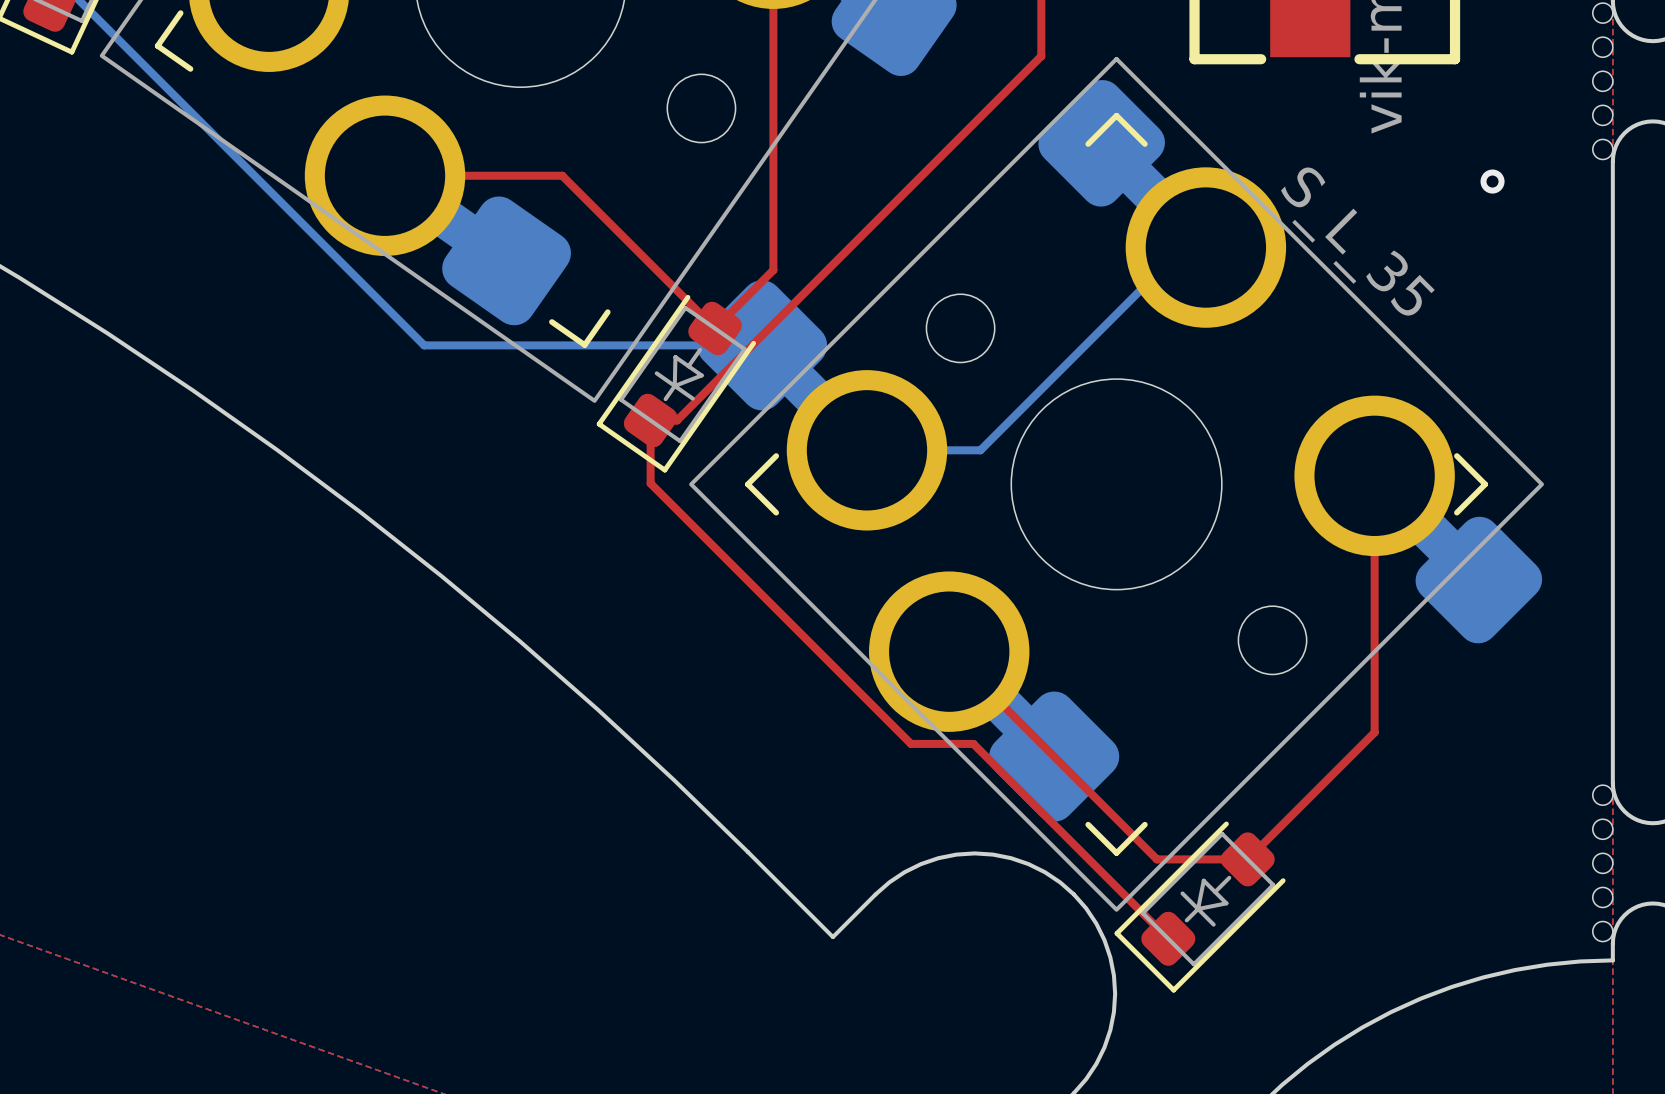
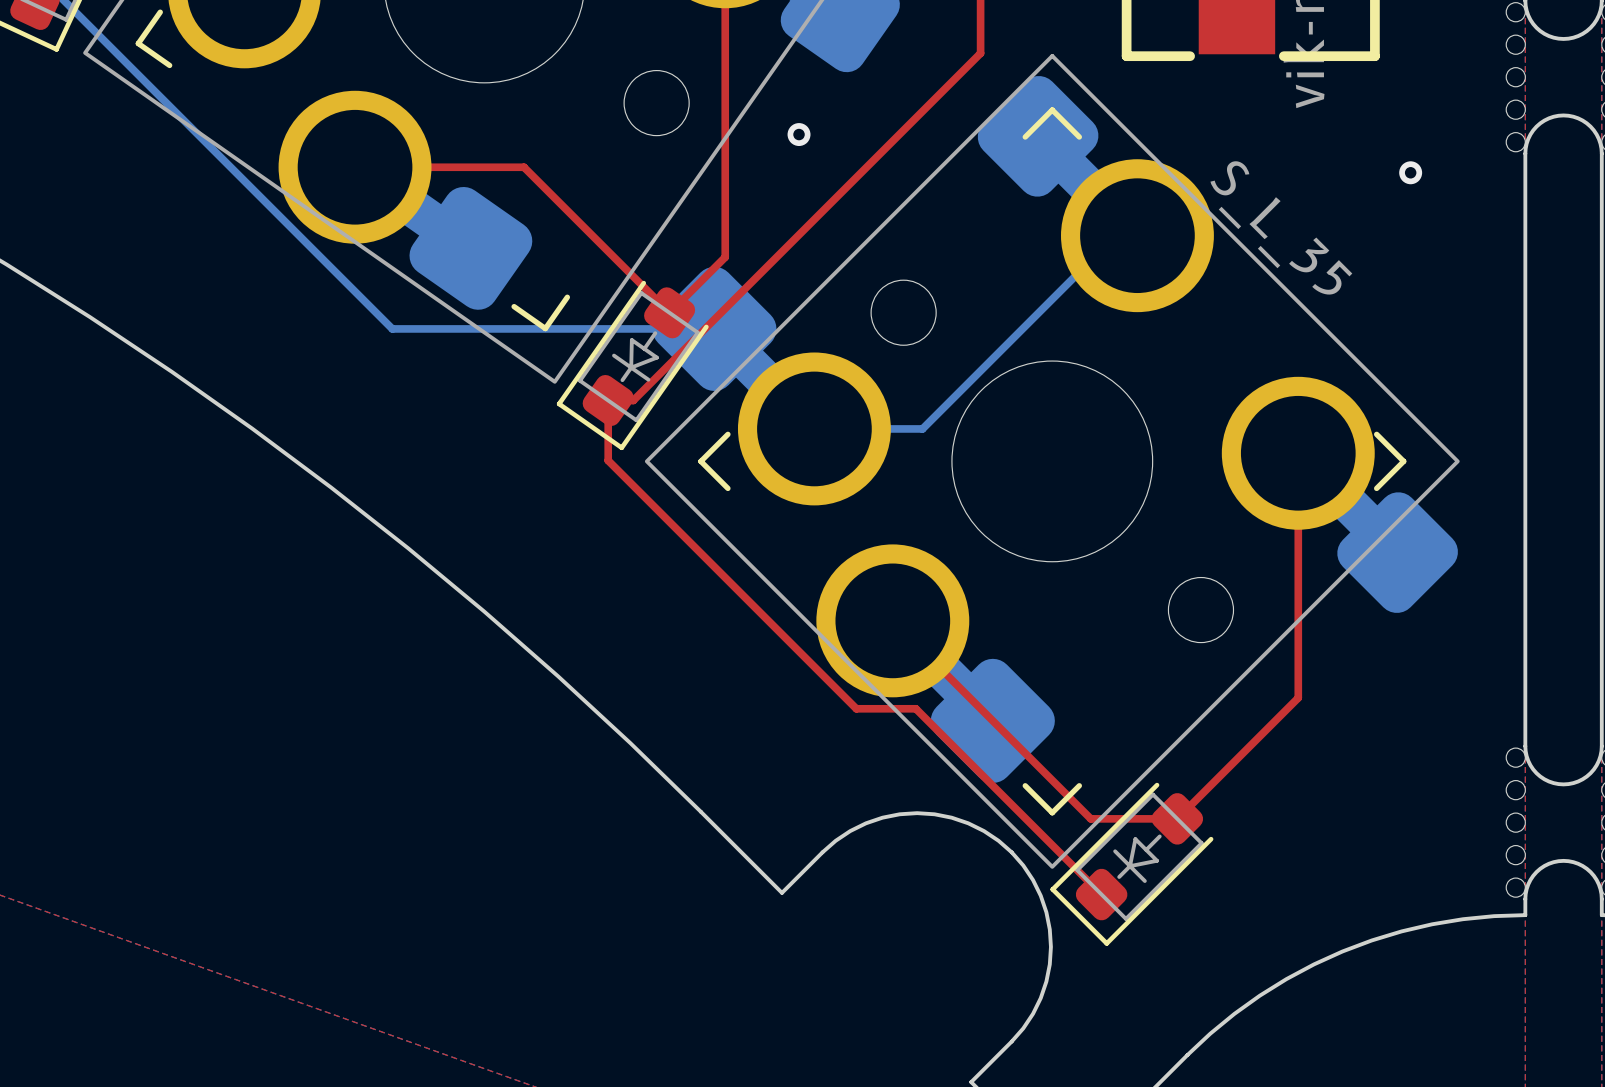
via: none -> (799, 134)

